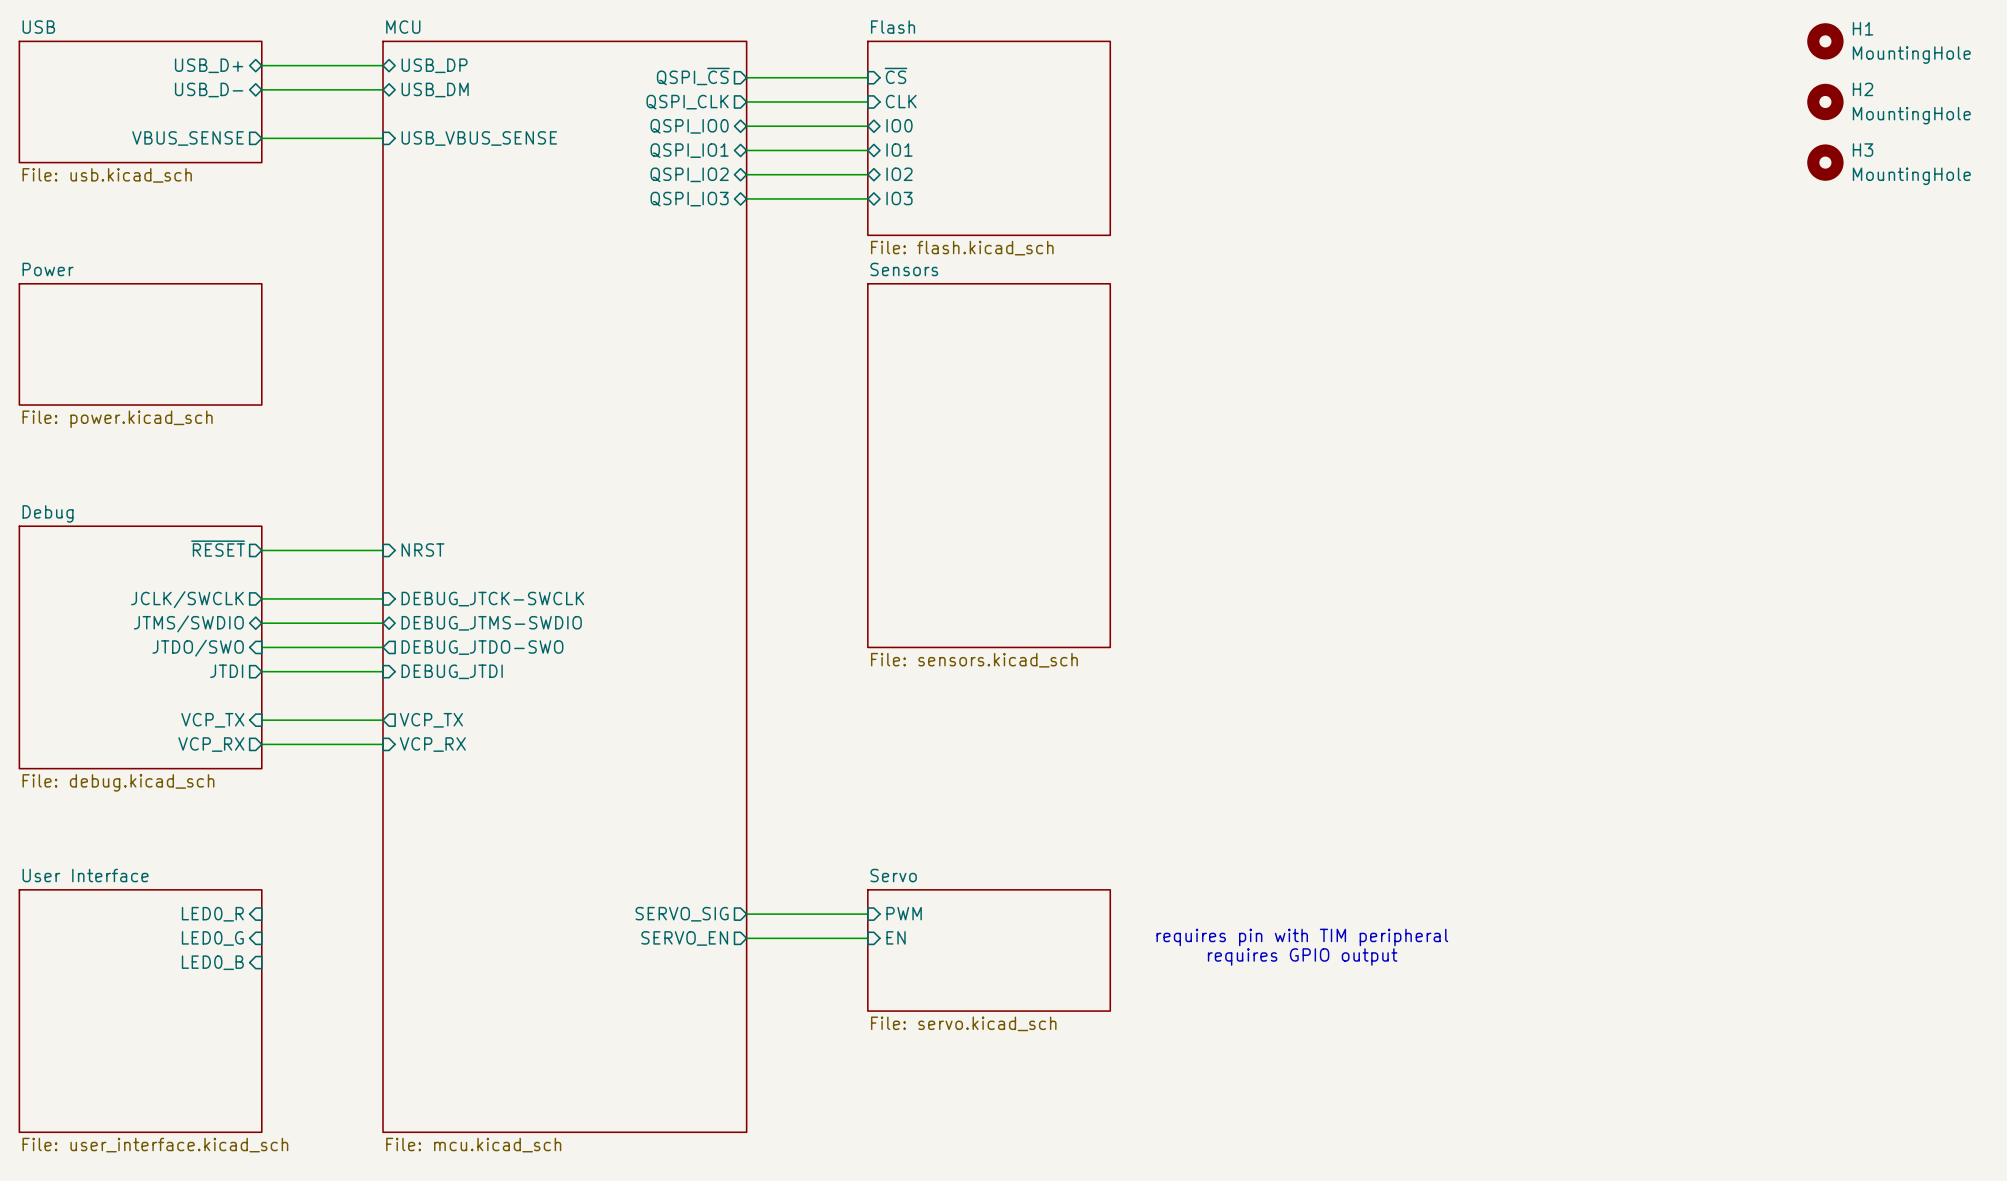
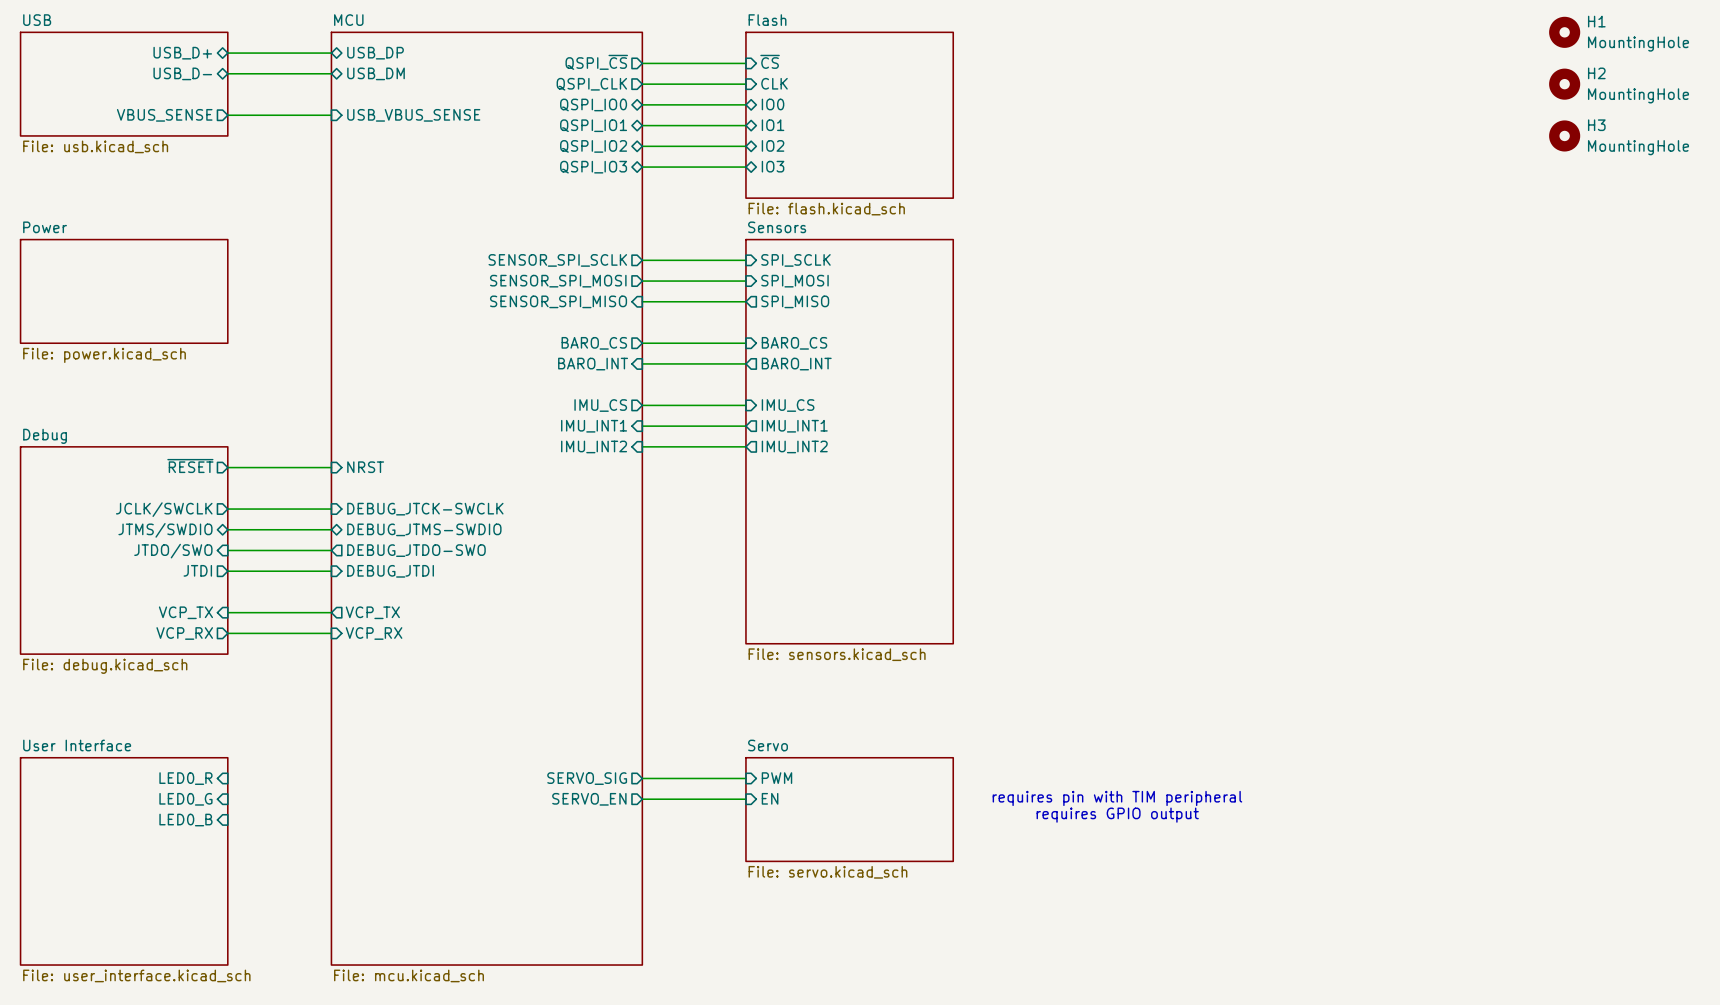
sheet pin: none -> SENSOR_SPI_SCLK (557, 260)
wire: none -> (642, 260) (745, 260)
sheet pin: none -> SPI_SCLK (795, 260)
sheet pin: none -> SENSOR_SPI_MOSI (558, 281)
wire: none -> (642, 281) (745, 281)
sheet pin: none -> SPI_MOSI (794, 281)
sheet pin: none -> SENSOR_SPI_MISO (558, 301)
wire: none -> (642, 301) (745, 301)
sheet pin: none -> SPI_MISO (795, 301)
sheet pin: none -> BARO_CS (594, 343)
wire: none -> (642, 343) (745, 343)
sheet pin: none -> BARO_CS (794, 343)
sheet pin: none -> BARO_INT (593, 364)
wire: none -> (642, 363) (745, 363)
sheet pin: none -> BARO_INT (796, 364)
sheet Sensors: File: sensors.kicad_sch (989, 465) -> none
sheet pin: none -> IMU_CS (600, 405)
wire: none -> (642, 405) (745, 405)
sheet pin: none -> IMU_CS (788, 405)
wire: none -> (642, 426) (745, 426)
sheet pin: none -> IMU_INT1 (594, 426)
sheet pin: none -> IMU_INT1 (794, 426)
sheet Sensors: none -> File: sensors.kicad_sch (849, 441)
sheet pin: none -> IMU_INT2 (594, 446)
wire: none -> (642, 446) (745, 446)
sheet pin: none -> IMU_INT2 (794, 446)

